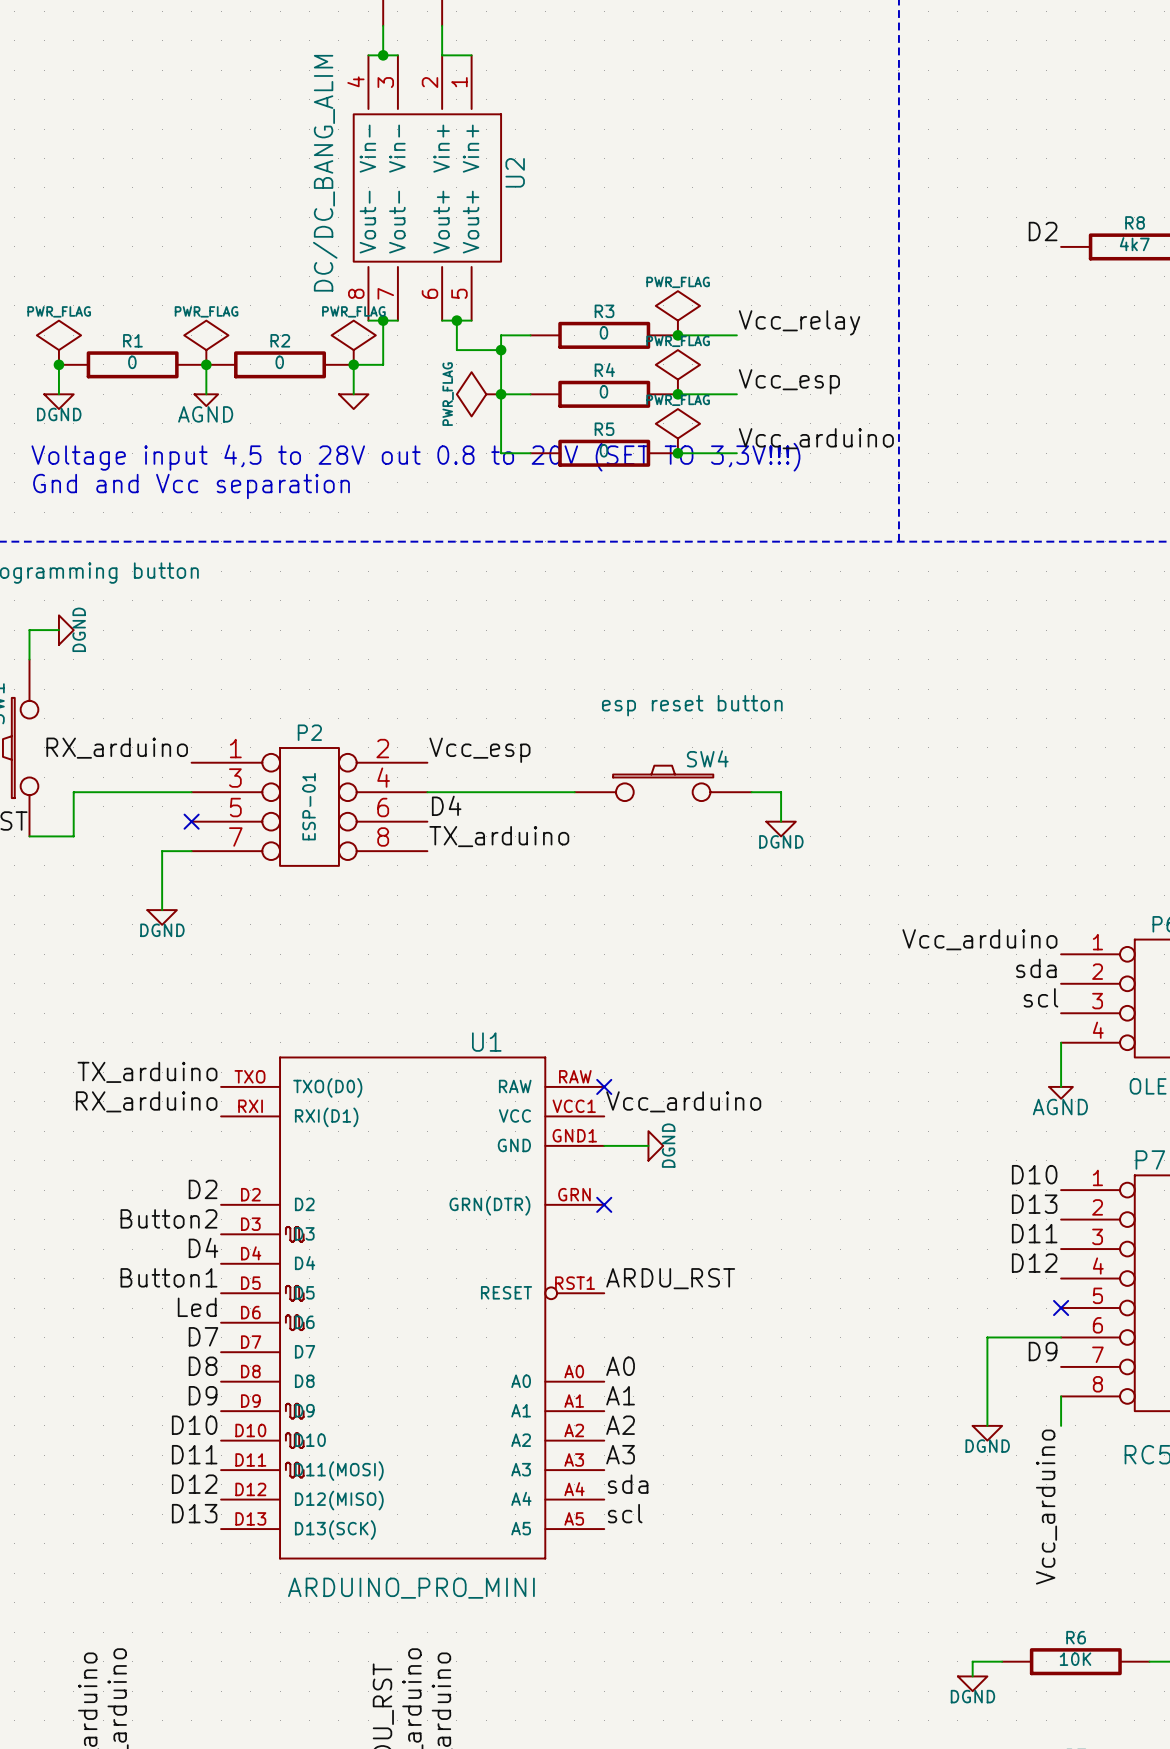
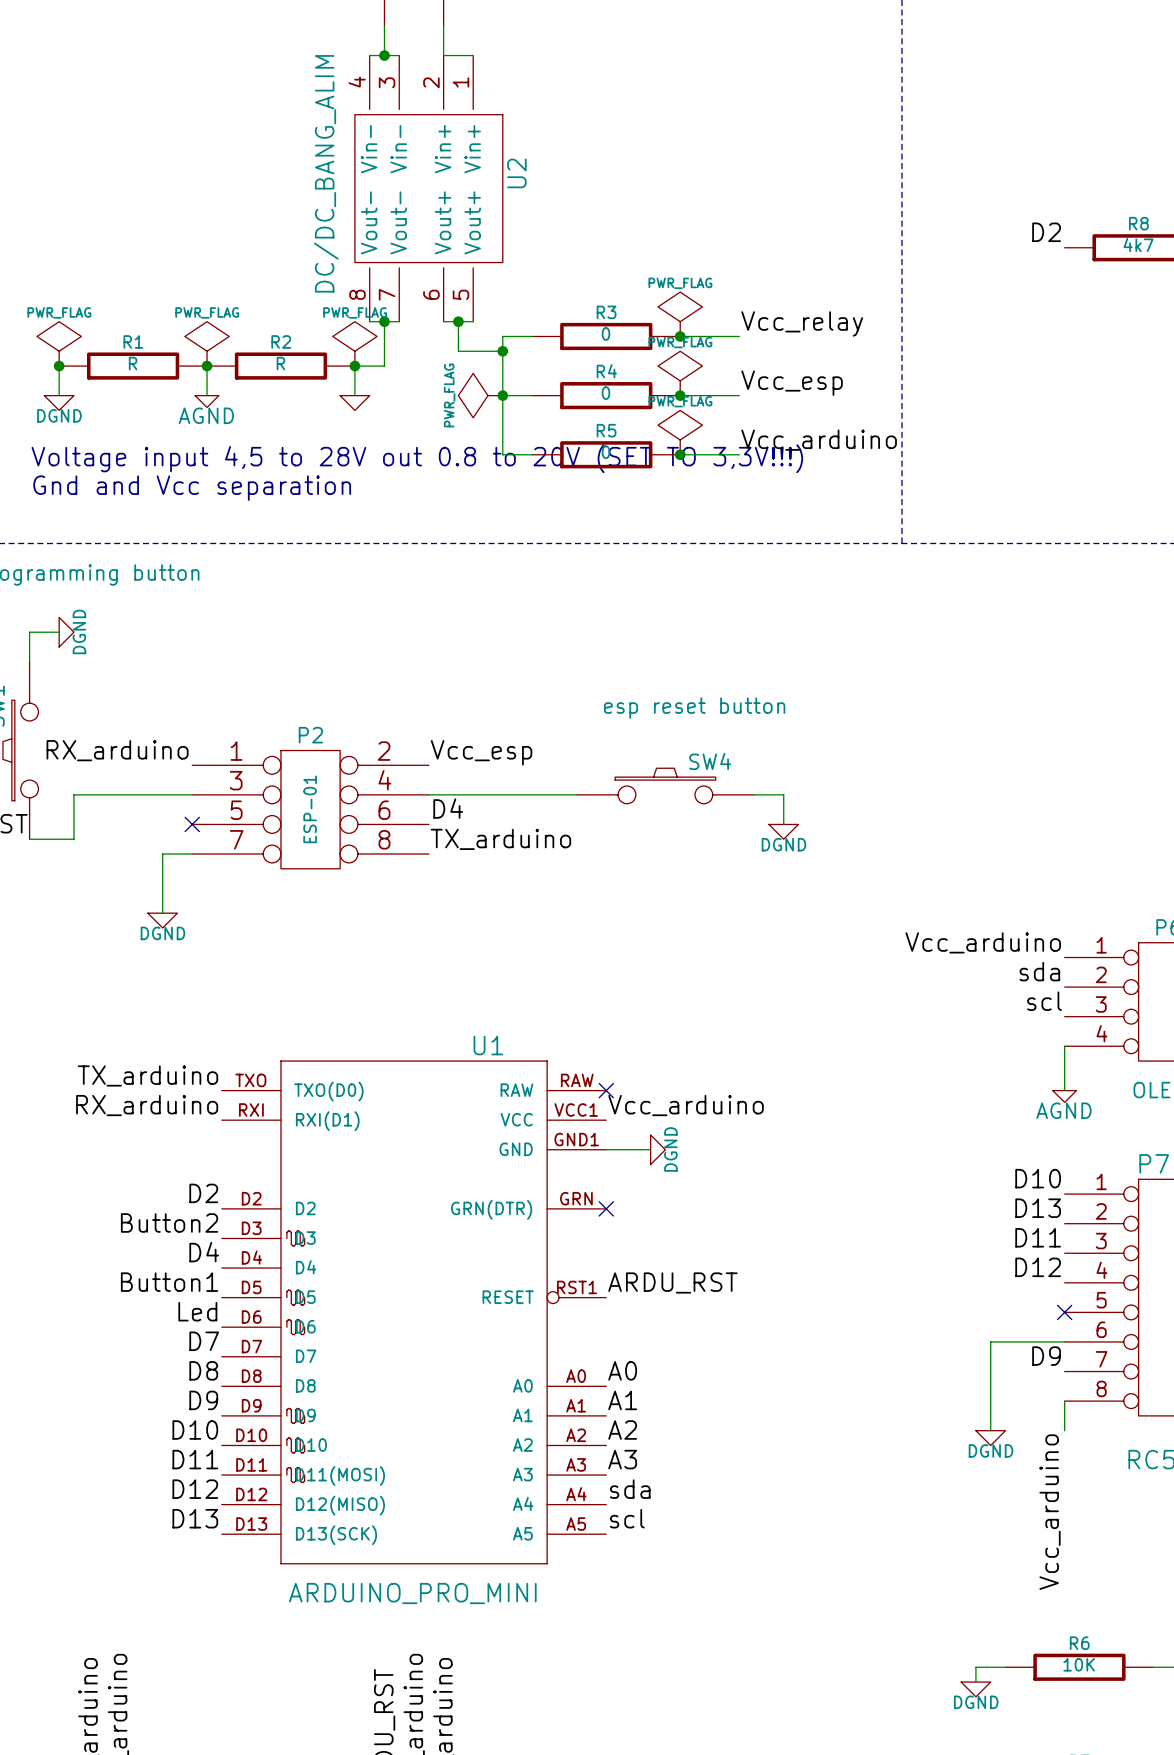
R1 value: 0 (132, 362) -> R (133, 363)
R2 value: 0 (279, 362) -> R (280, 363)

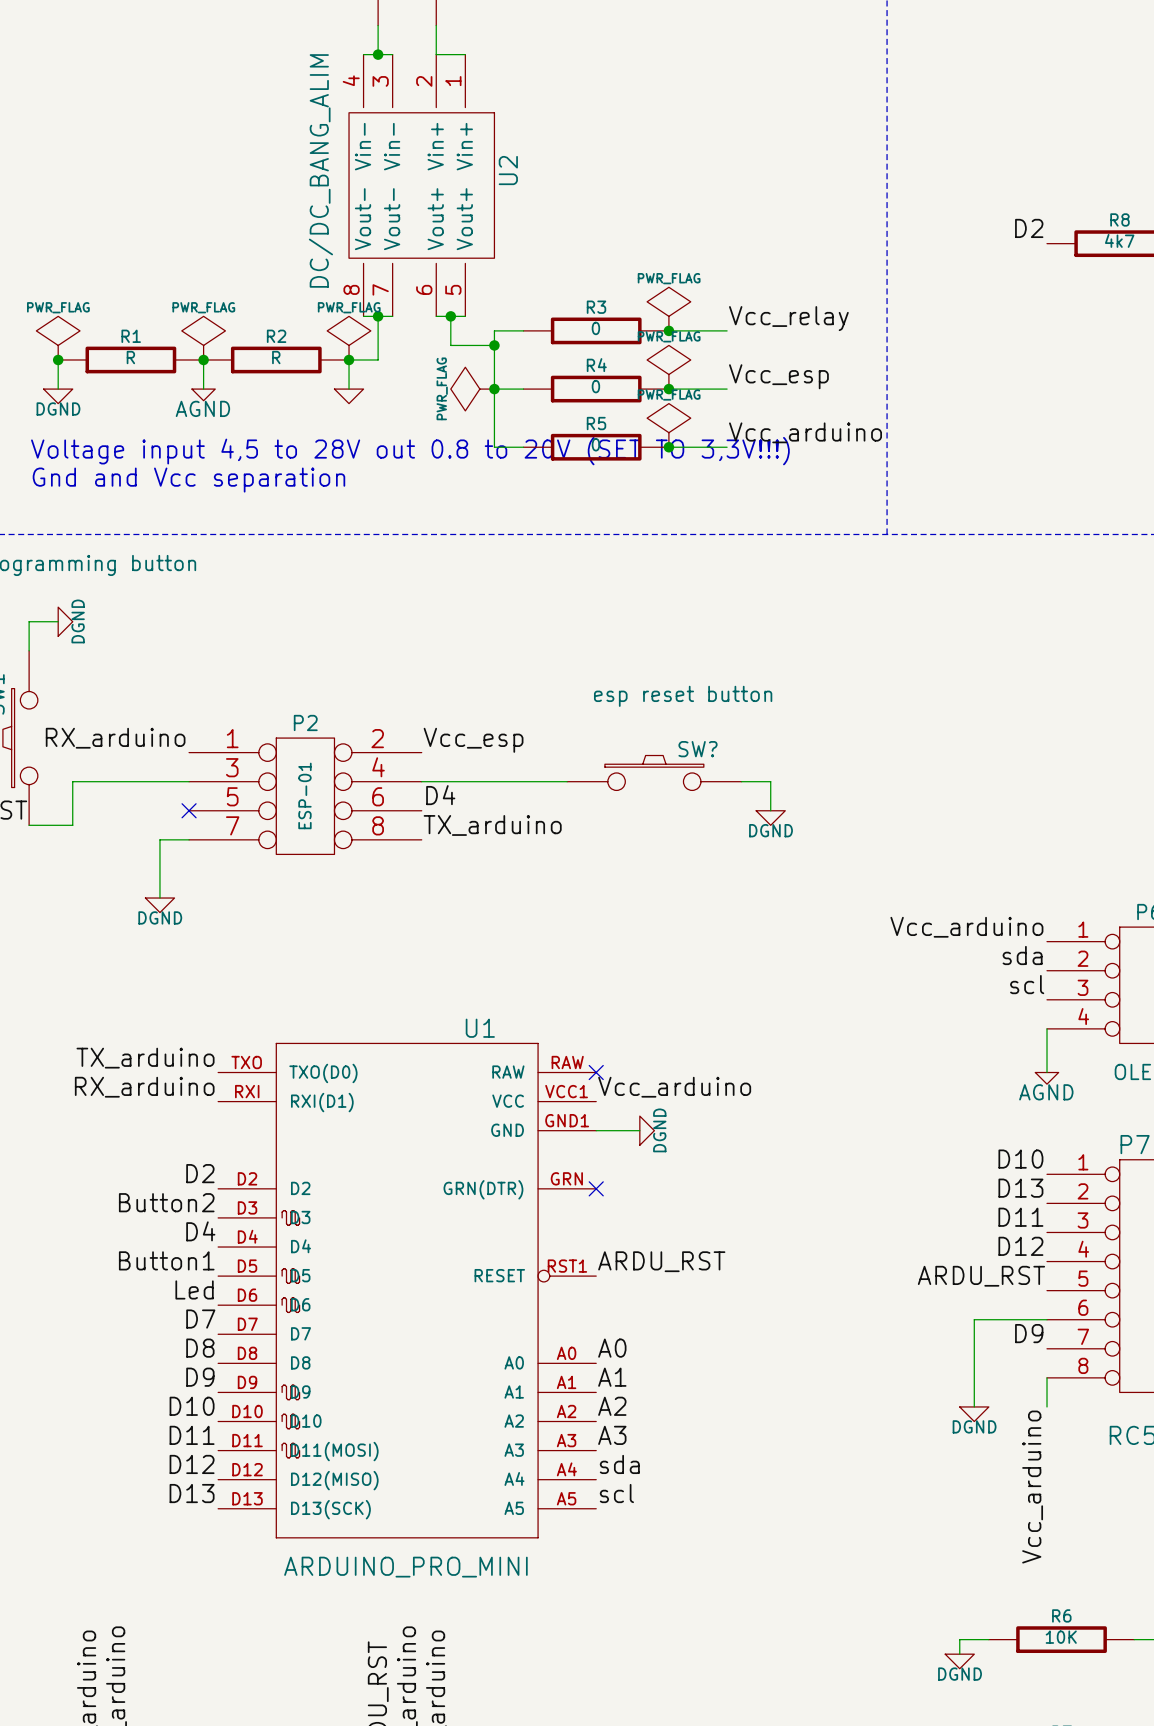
SW4 name: SW4 (710, 761) -> SW? (698, 749)
label: none -> ARDU_RST (981, 1276)
no-connect mark: (1064, 1312) -> none

